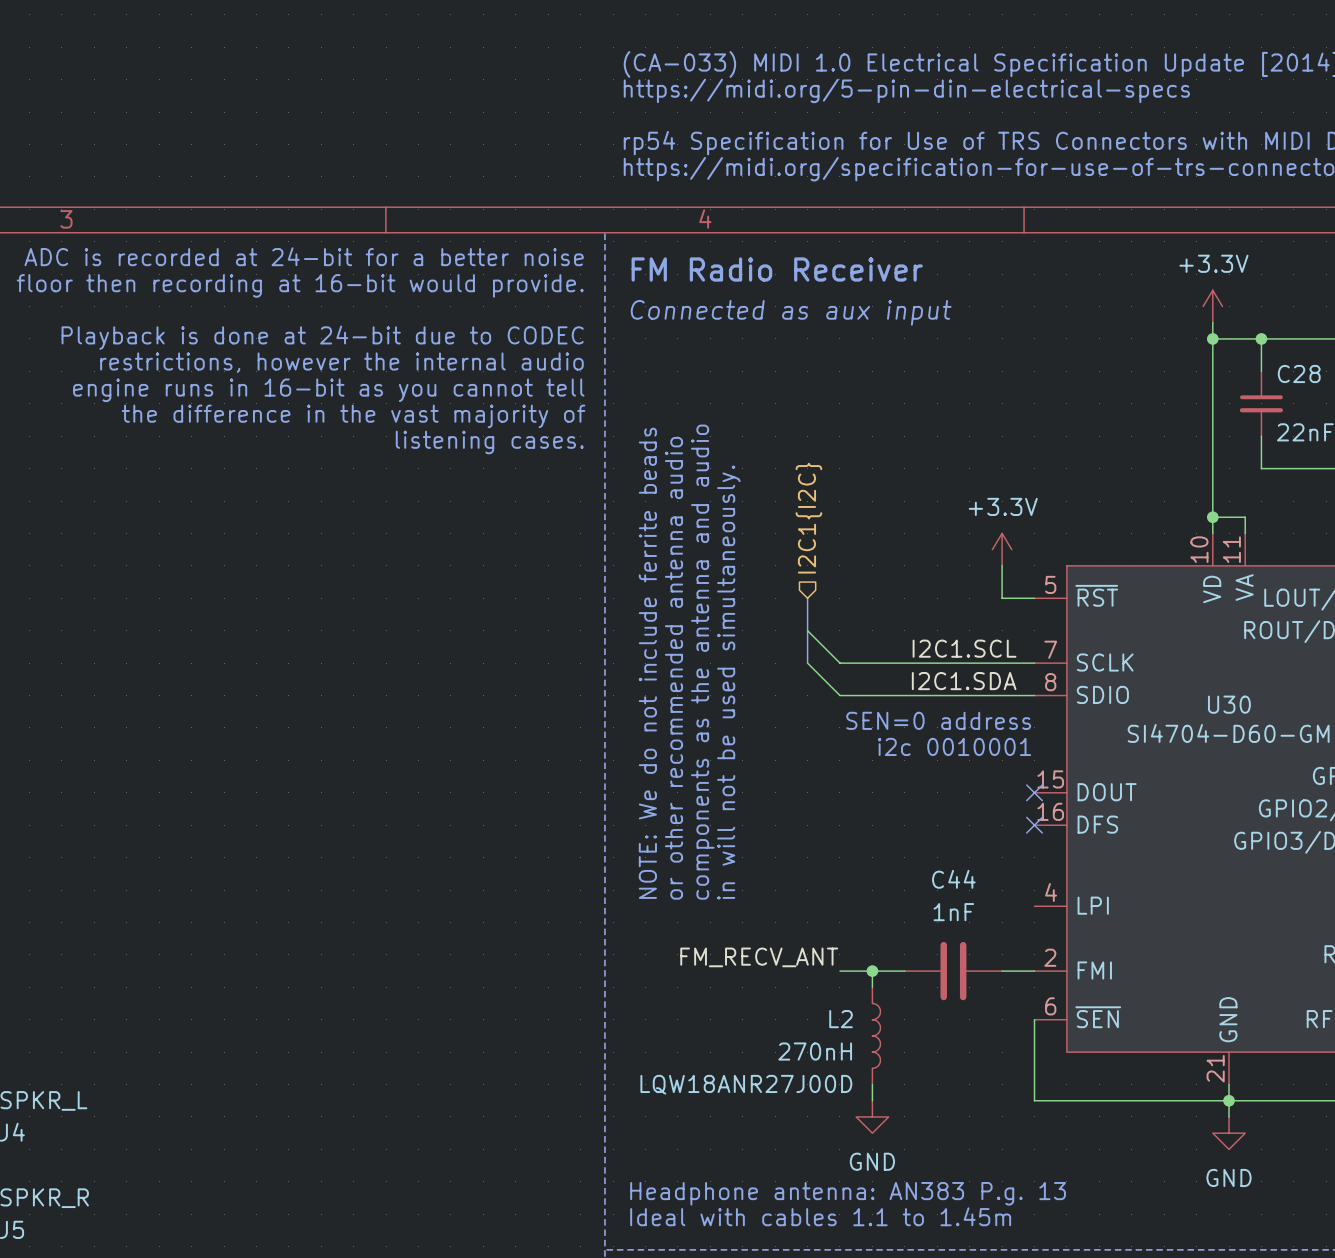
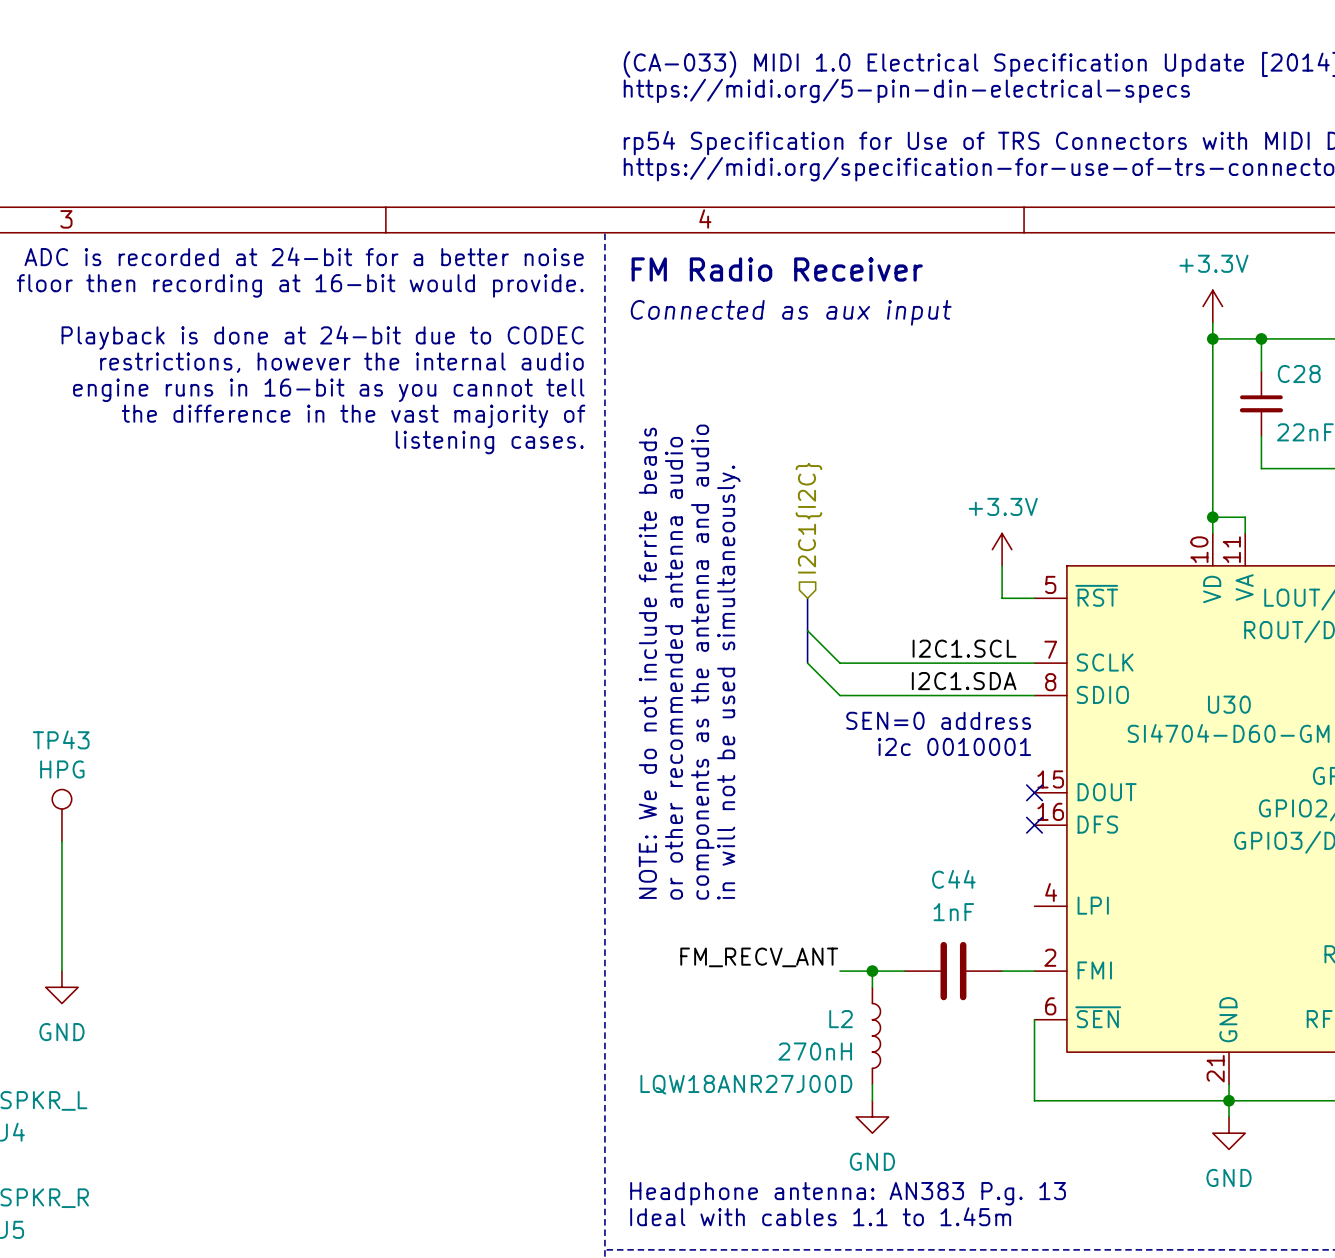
TP43: none -> HPG (61, 815)
wire: none -> (61, 841) (61, 971)
power symbol: none -> GND (61, 987)

